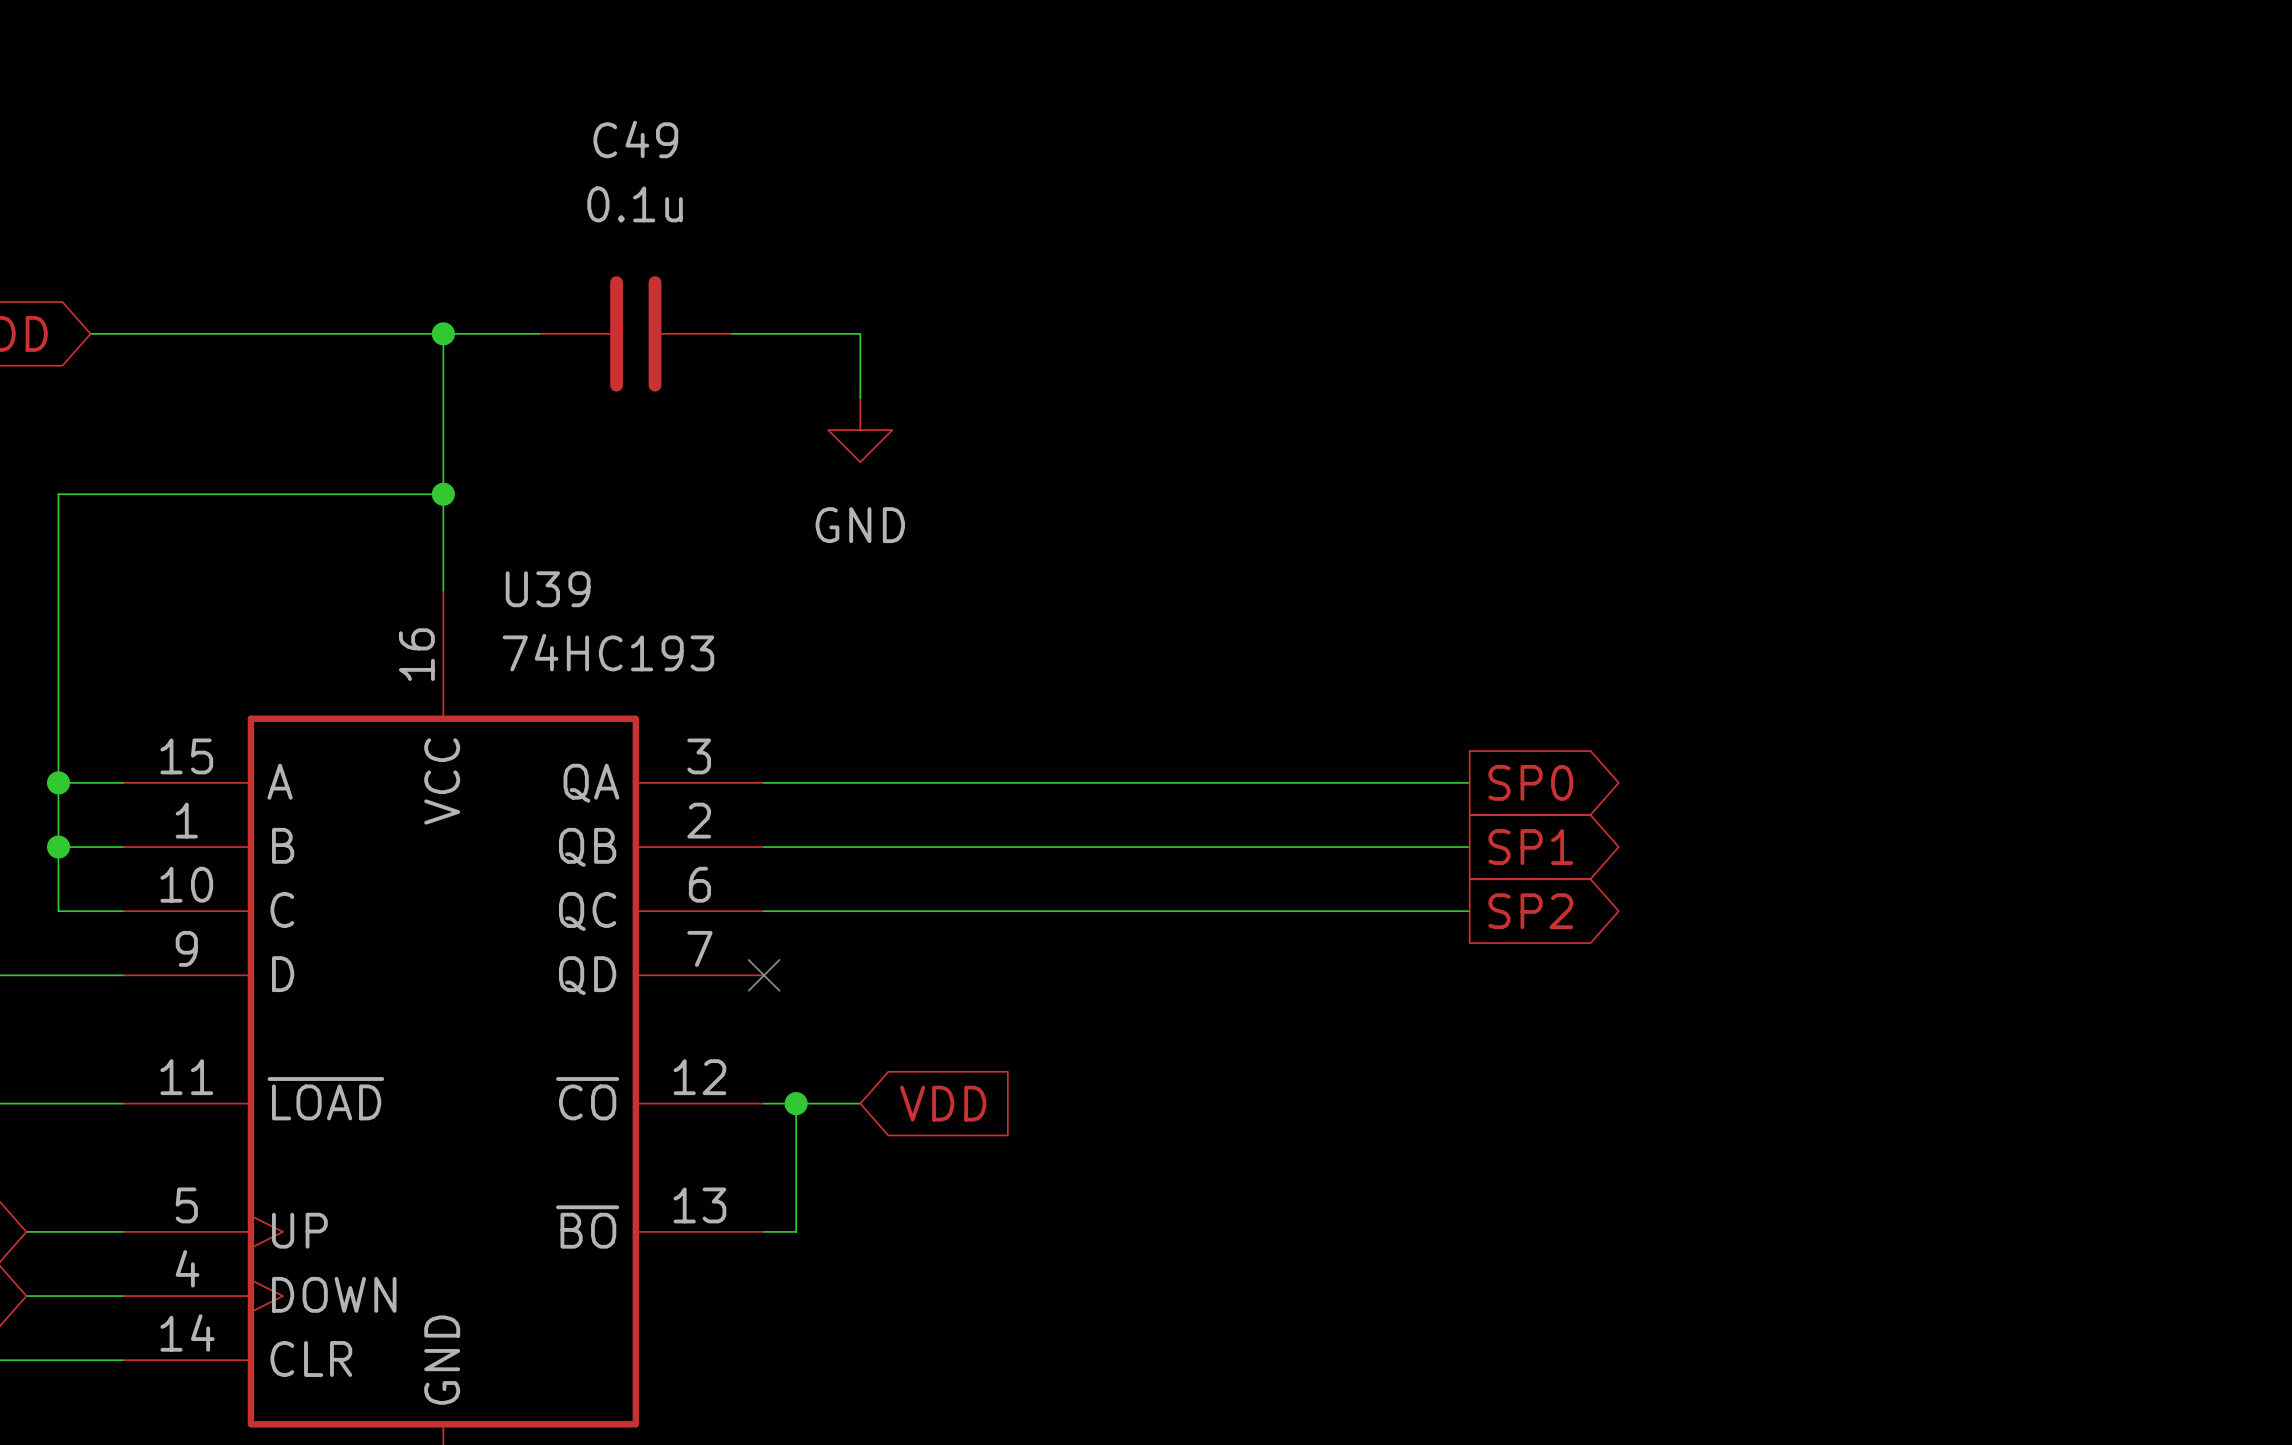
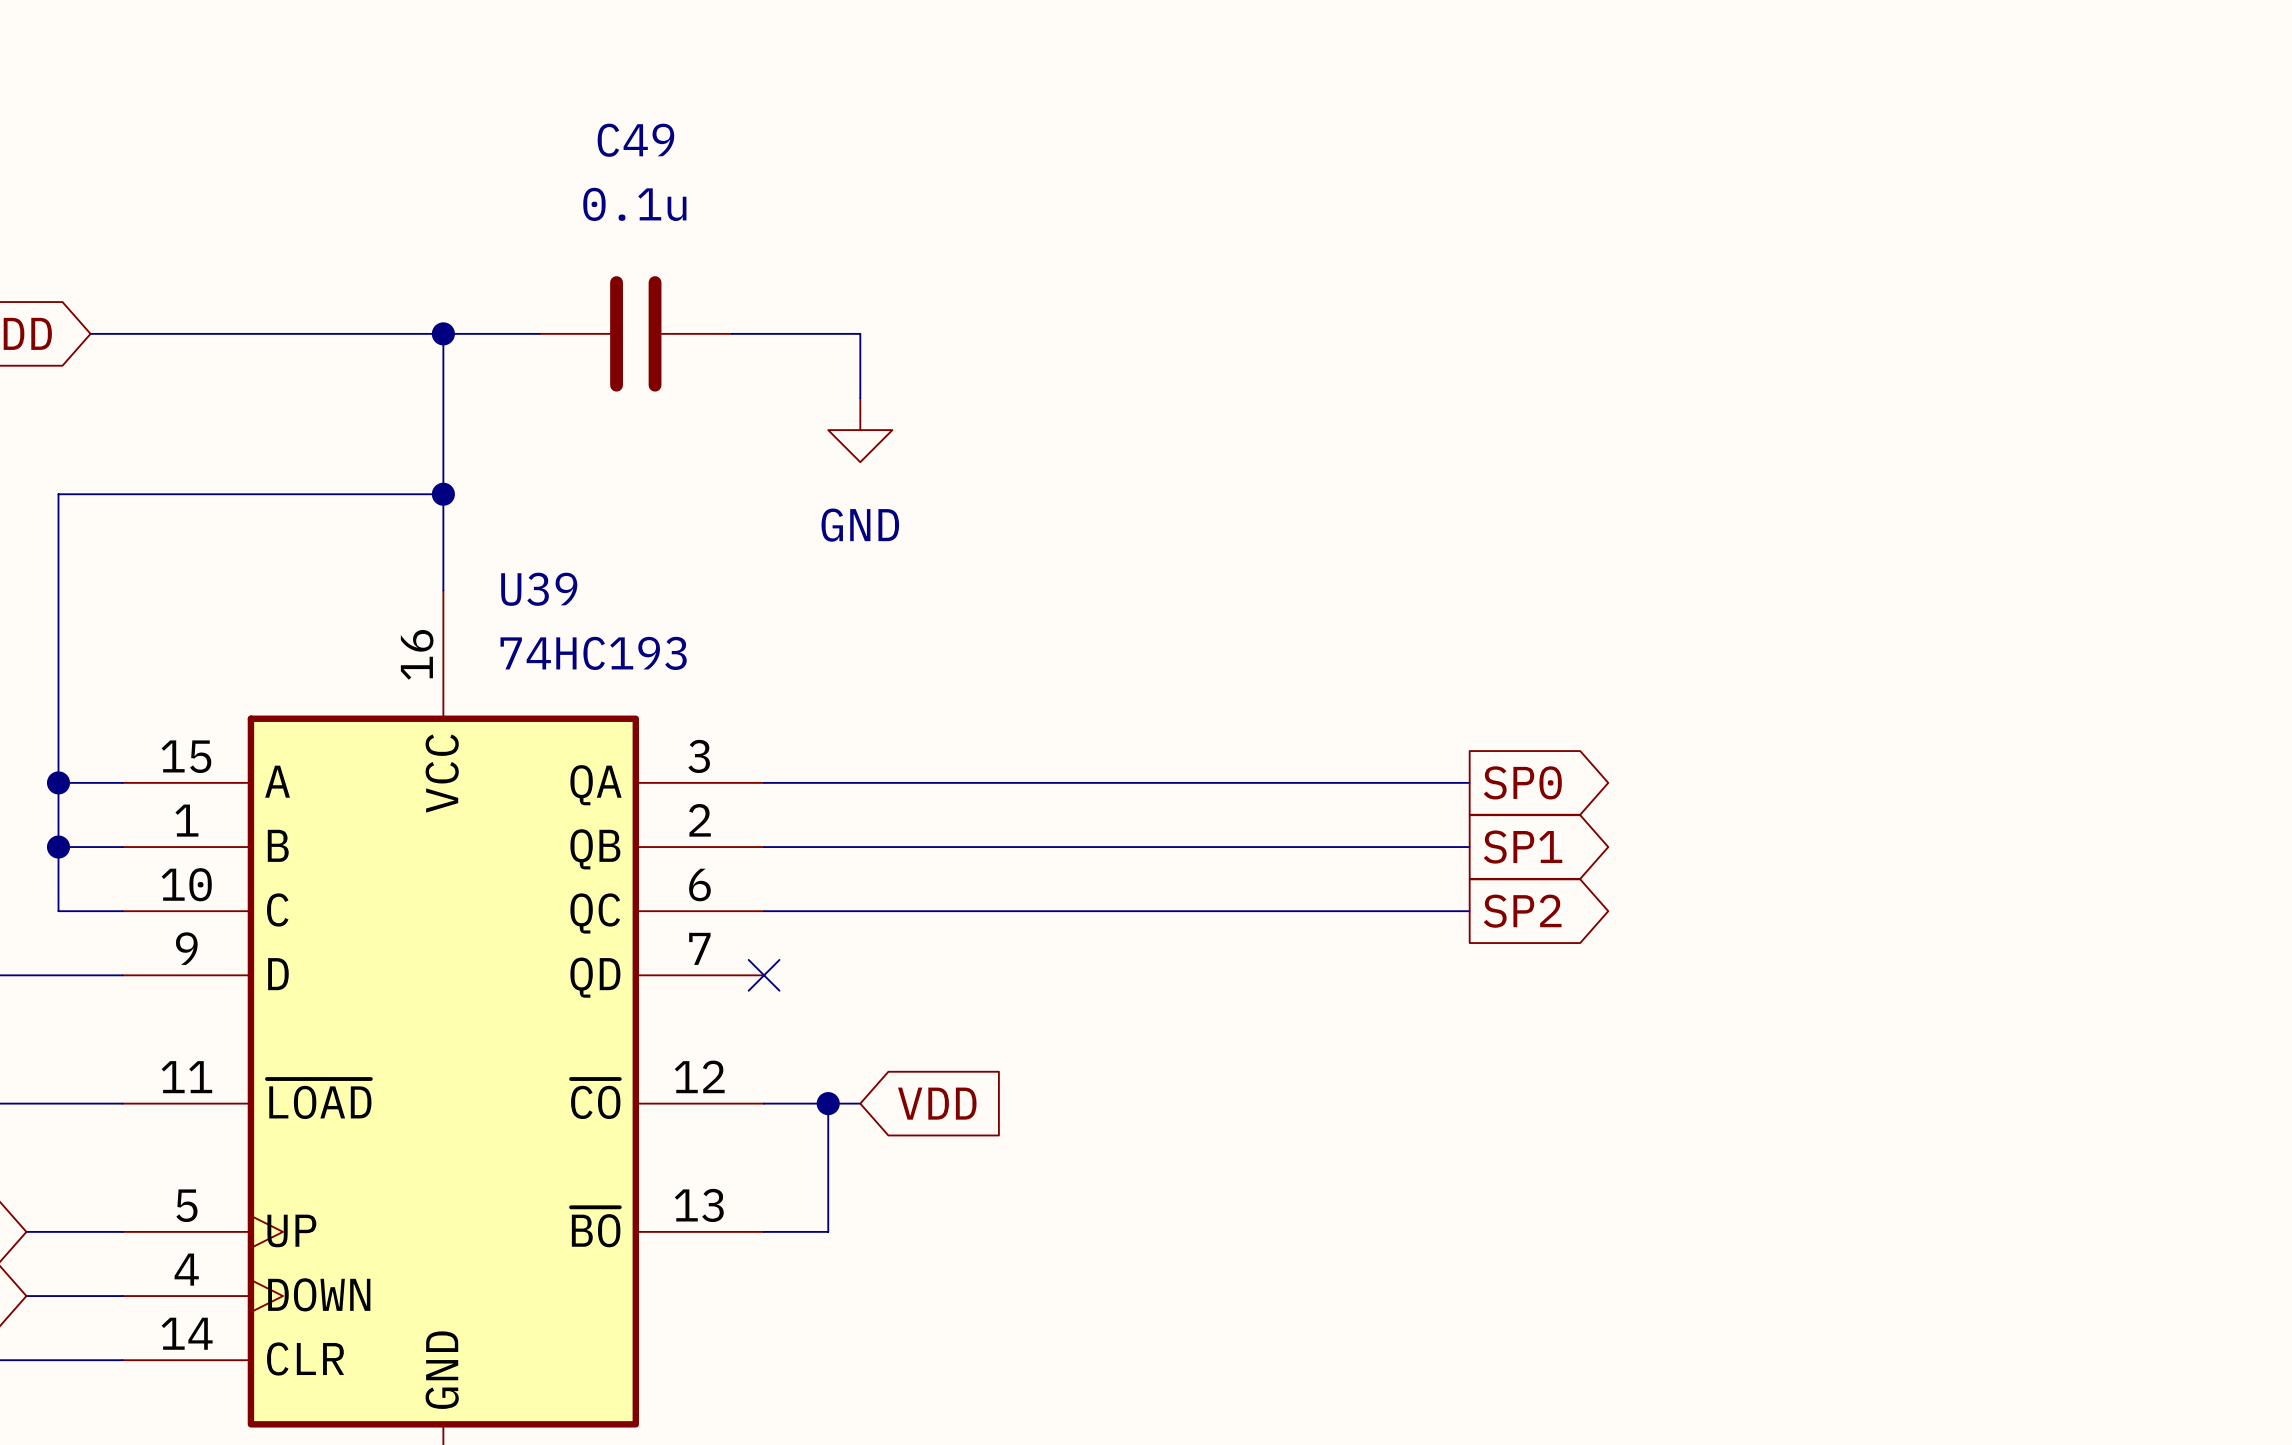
wire: (796, 1103) (796, 1231) -> (828, 1103) (828, 1231) (796, 1231)
junction position: (796, 1103) -> (828, 1103)

